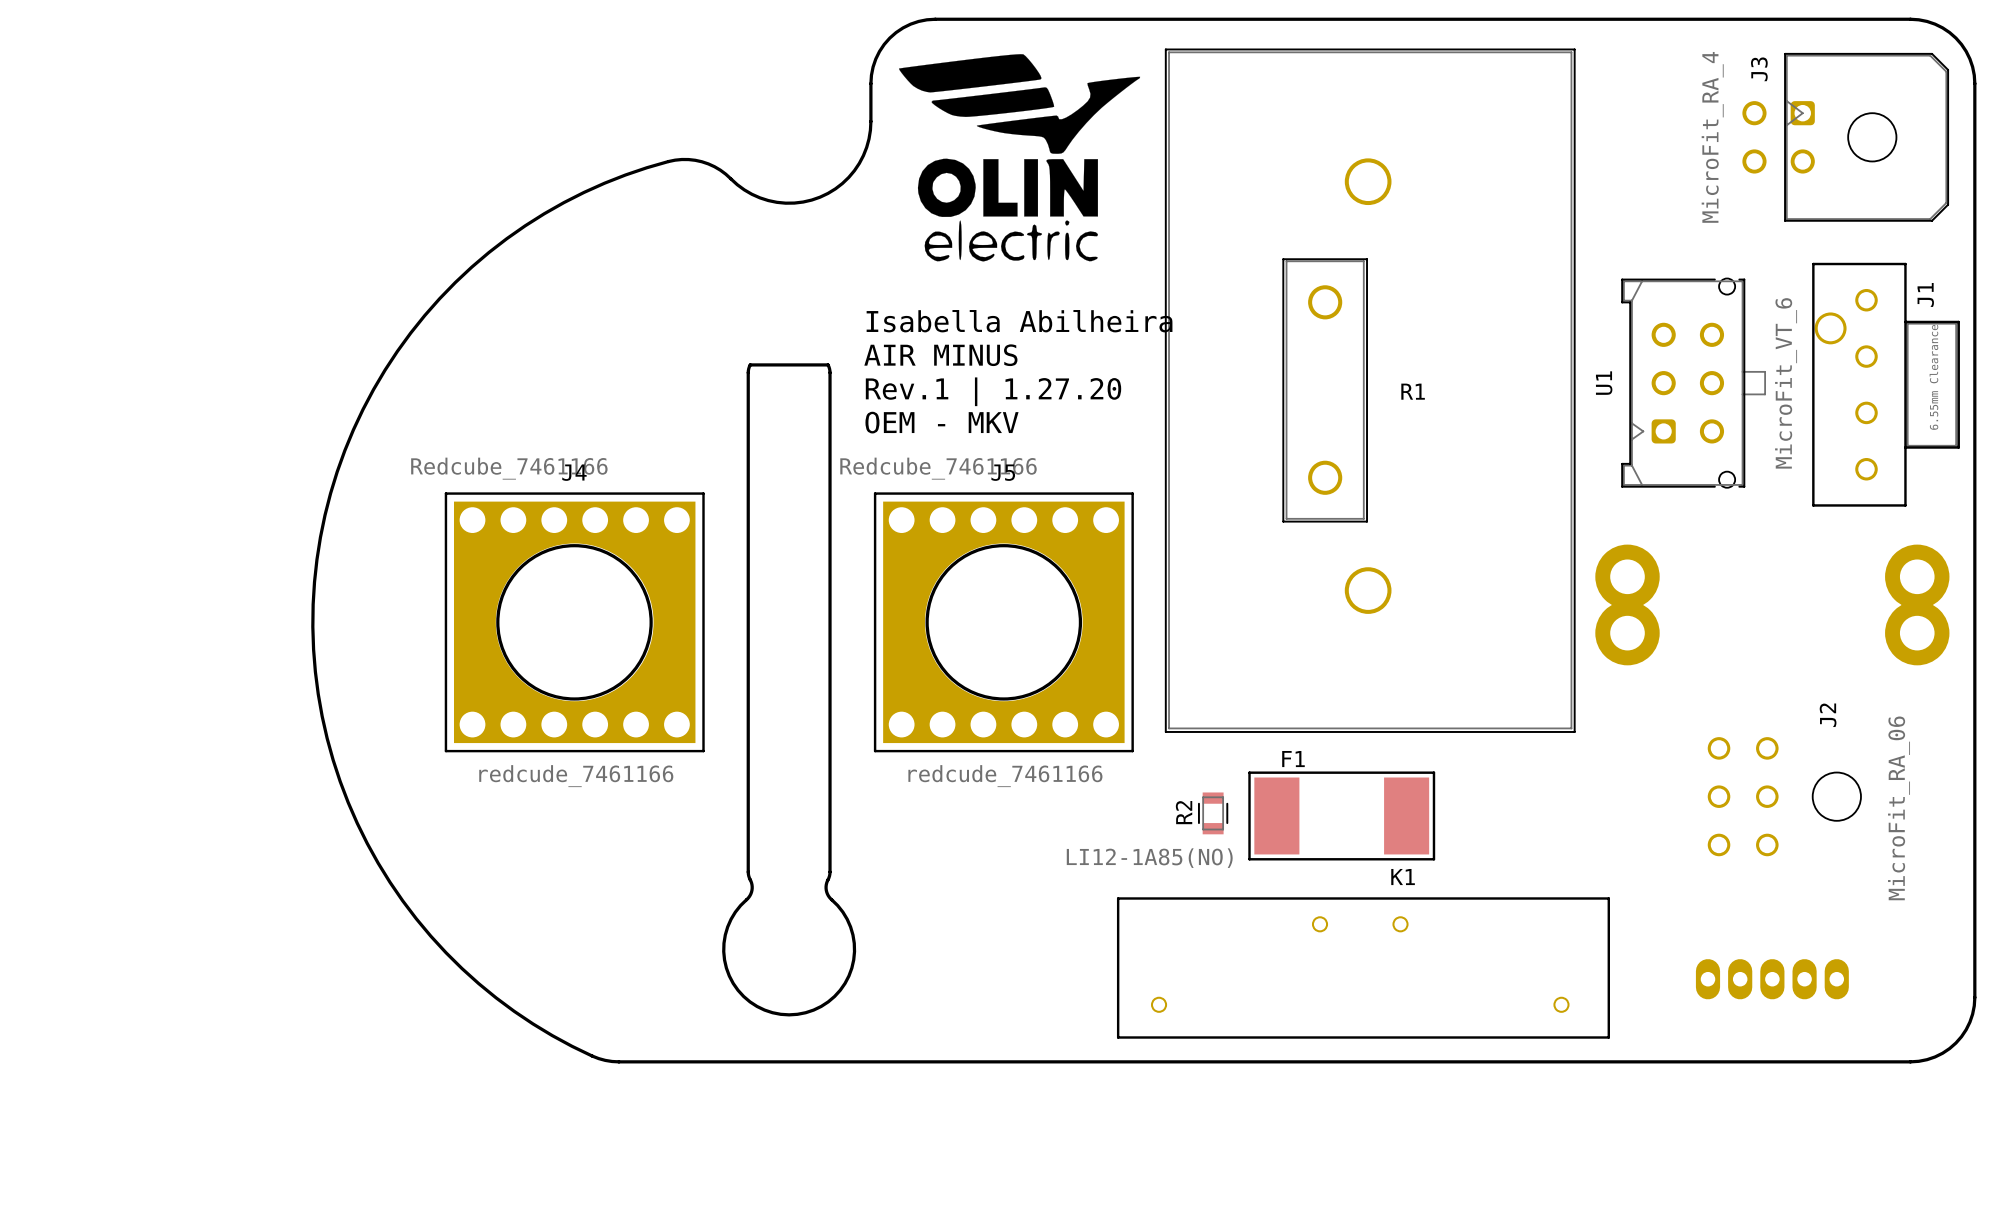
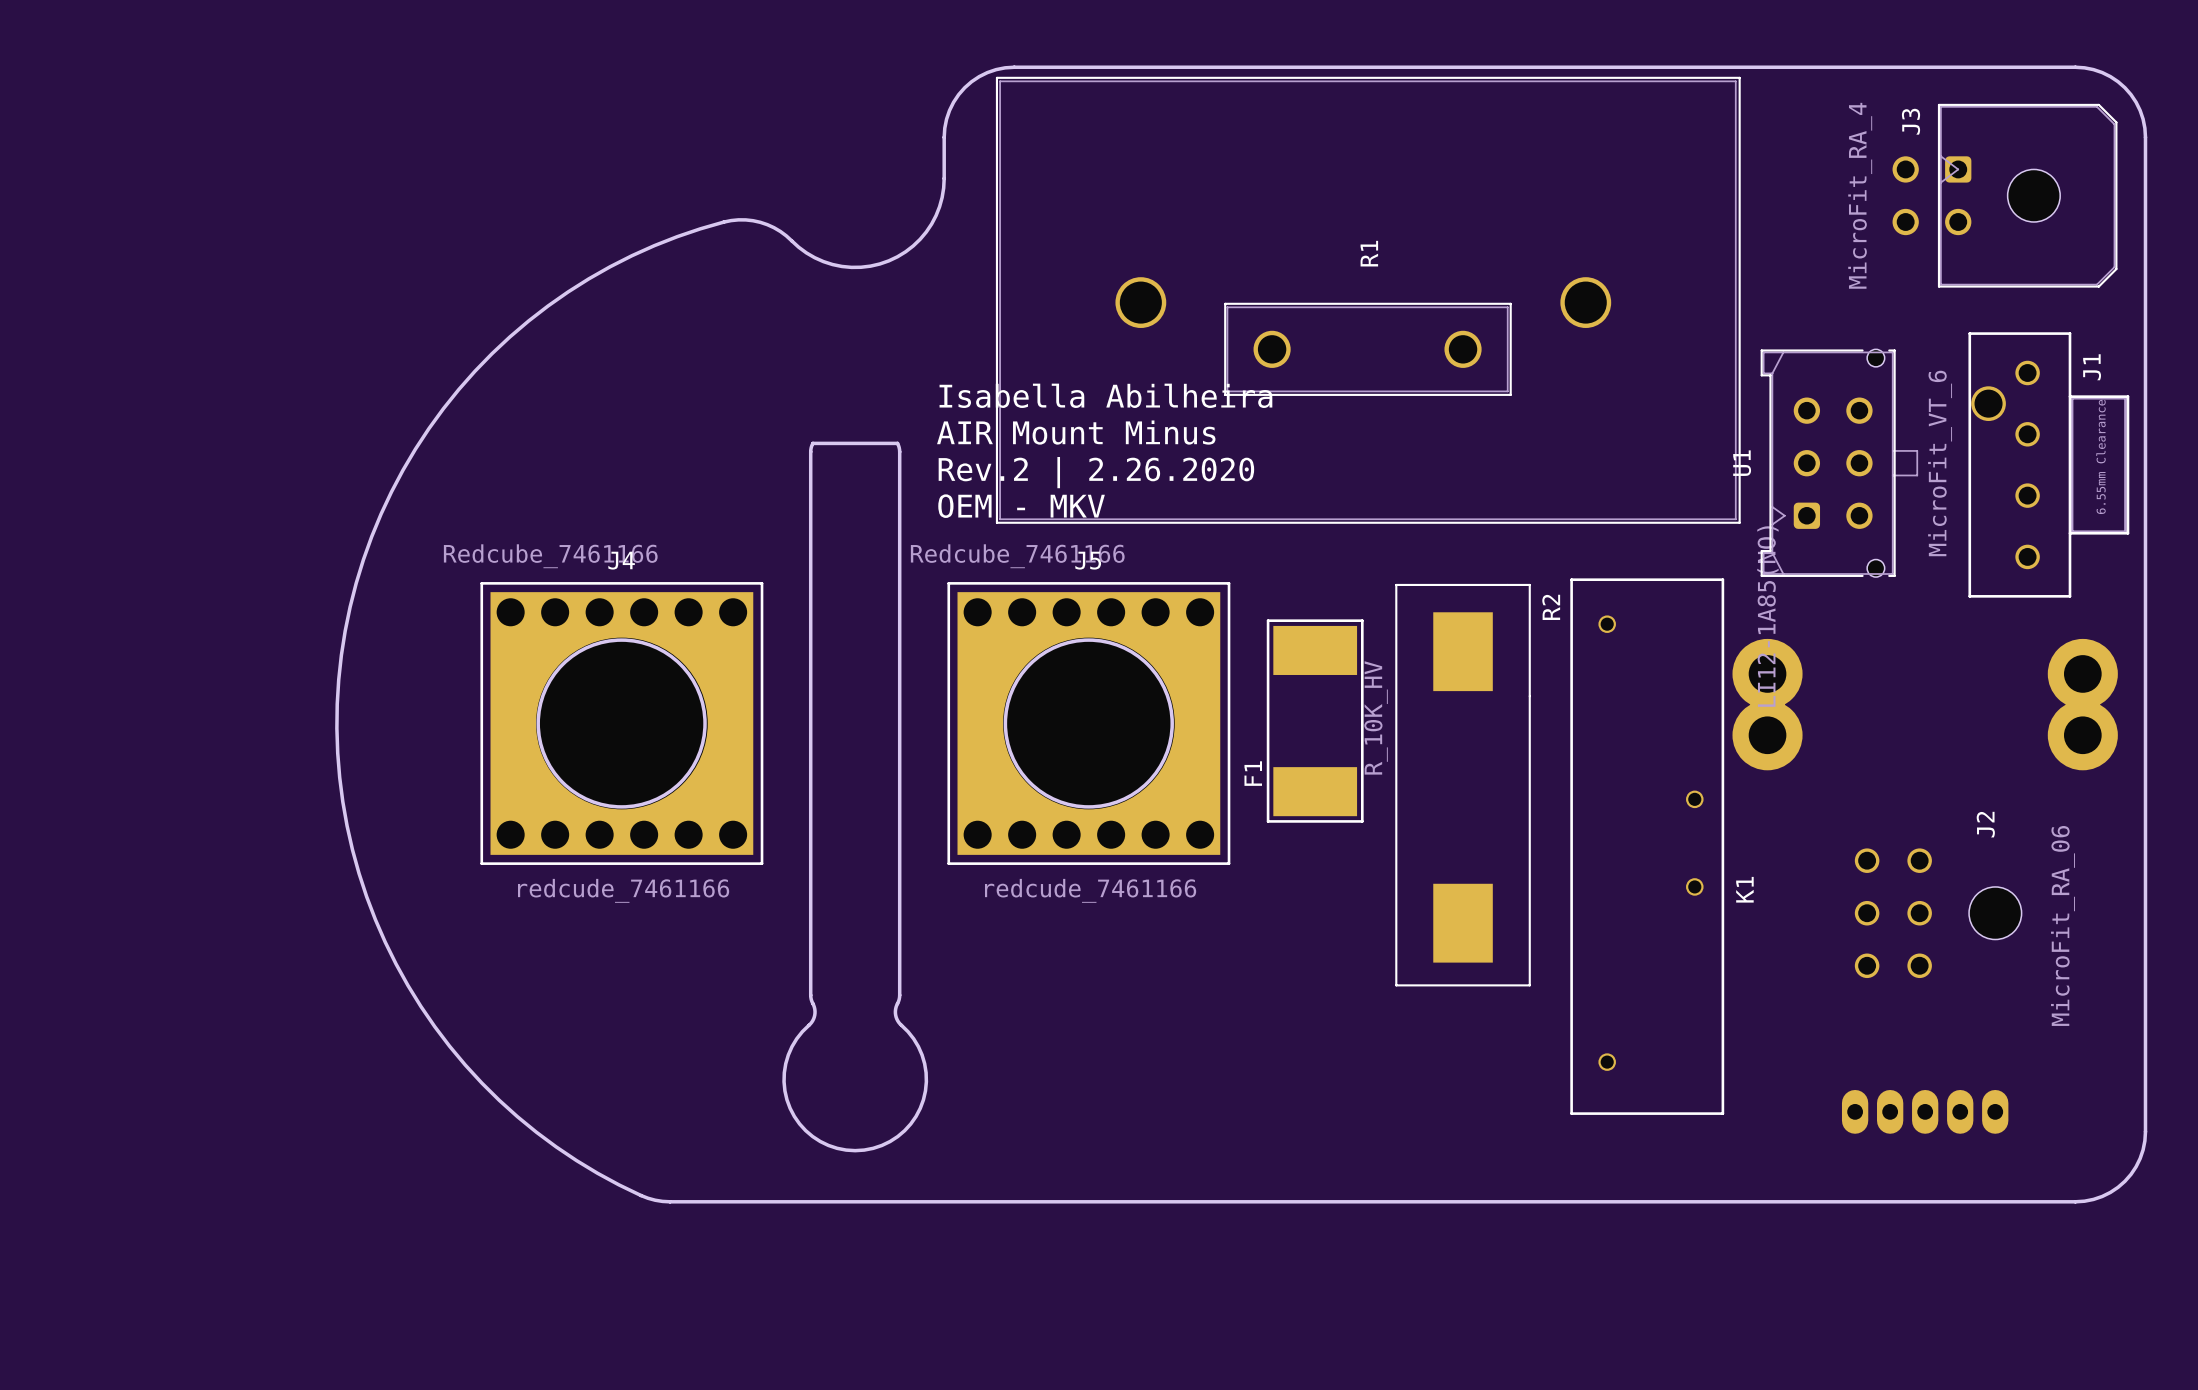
drawing: [898, 54, 1141, 262] -> none
text: AIR MINUS (940, 355) -> AIR Mount Minus (1076, 432)
R1 rotation: 0° (1370, 390) -> 90° counterclockwise (1368, 300)
text: Rev.1 | 1.27.20 (993, 391) -> Rev.2 | 2.26.2020 (1096, 472)
R2 value: none -> R_10K_HV (1376, 717)
F1 name position: F1 (1293, 759) -> F1 (1253, 773)
R2 footprint: [1197, 792, 1229, 835] -> [1395, 583, 1531, 987]
R2 name position: R2 (1184, 812) -> R2 (1551, 607)
F1 rotation: 0° (1341, 815) -> 90° clockwise (1315, 721)
F1 position: (1341, 815) -> (1315, 721)
K1 rotation: 0° (1363, 967) -> 90° clockwise (1647, 846)

